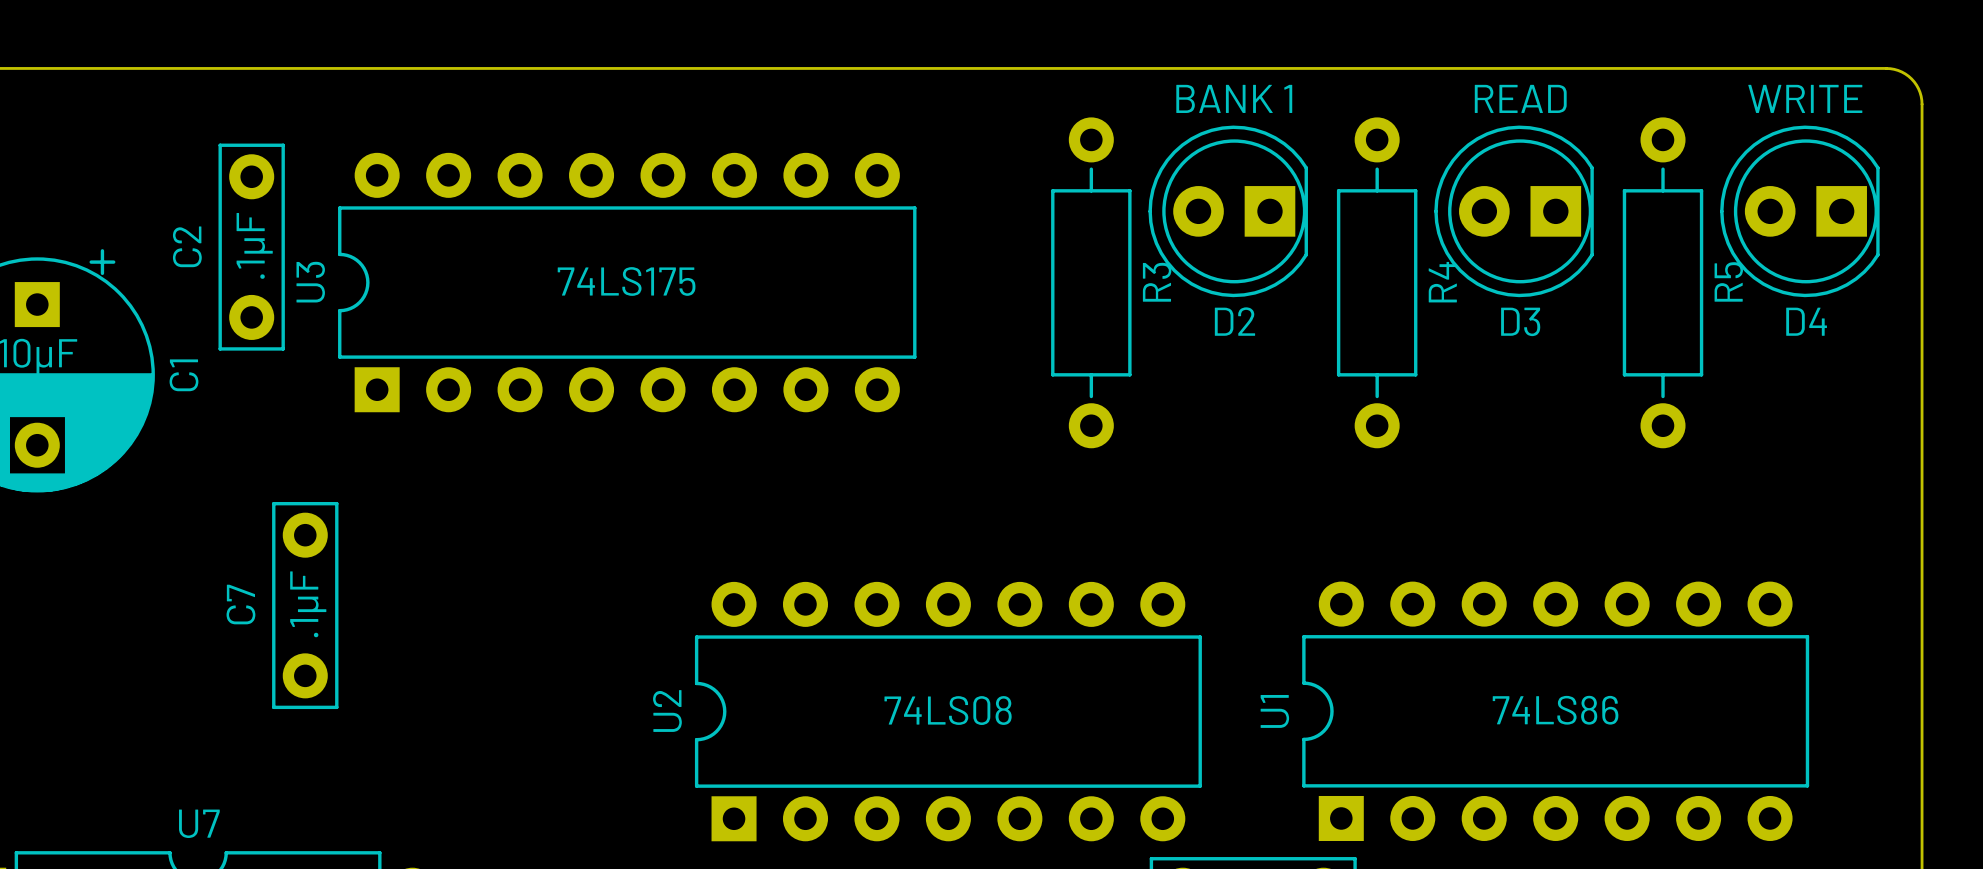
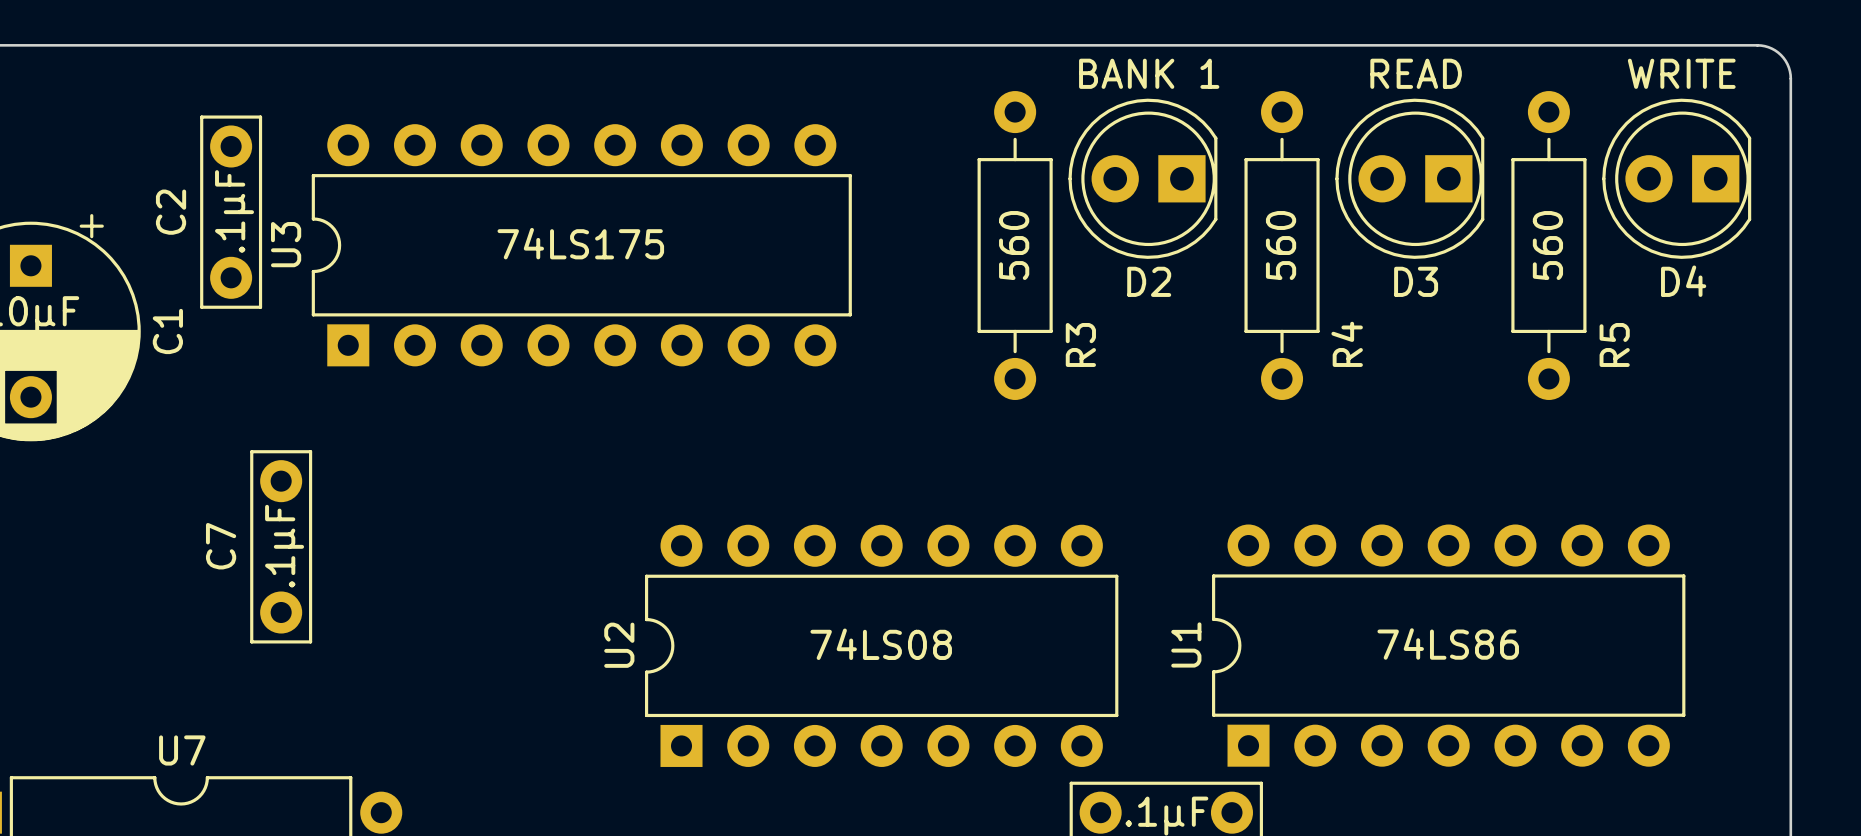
R5 name position: R5 (1728, 281) -> R5 (1614, 344)
R3 value: none -> 560 (1014, 245)
R3 name position: R3 (1157, 282) -> R3 (1080, 344)
R4 value: none -> 560 (1281, 245)
R4 name position: R4 (1442, 282) -> R4 (1347, 344)
R5 value: none -> 560 (1547, 245)

